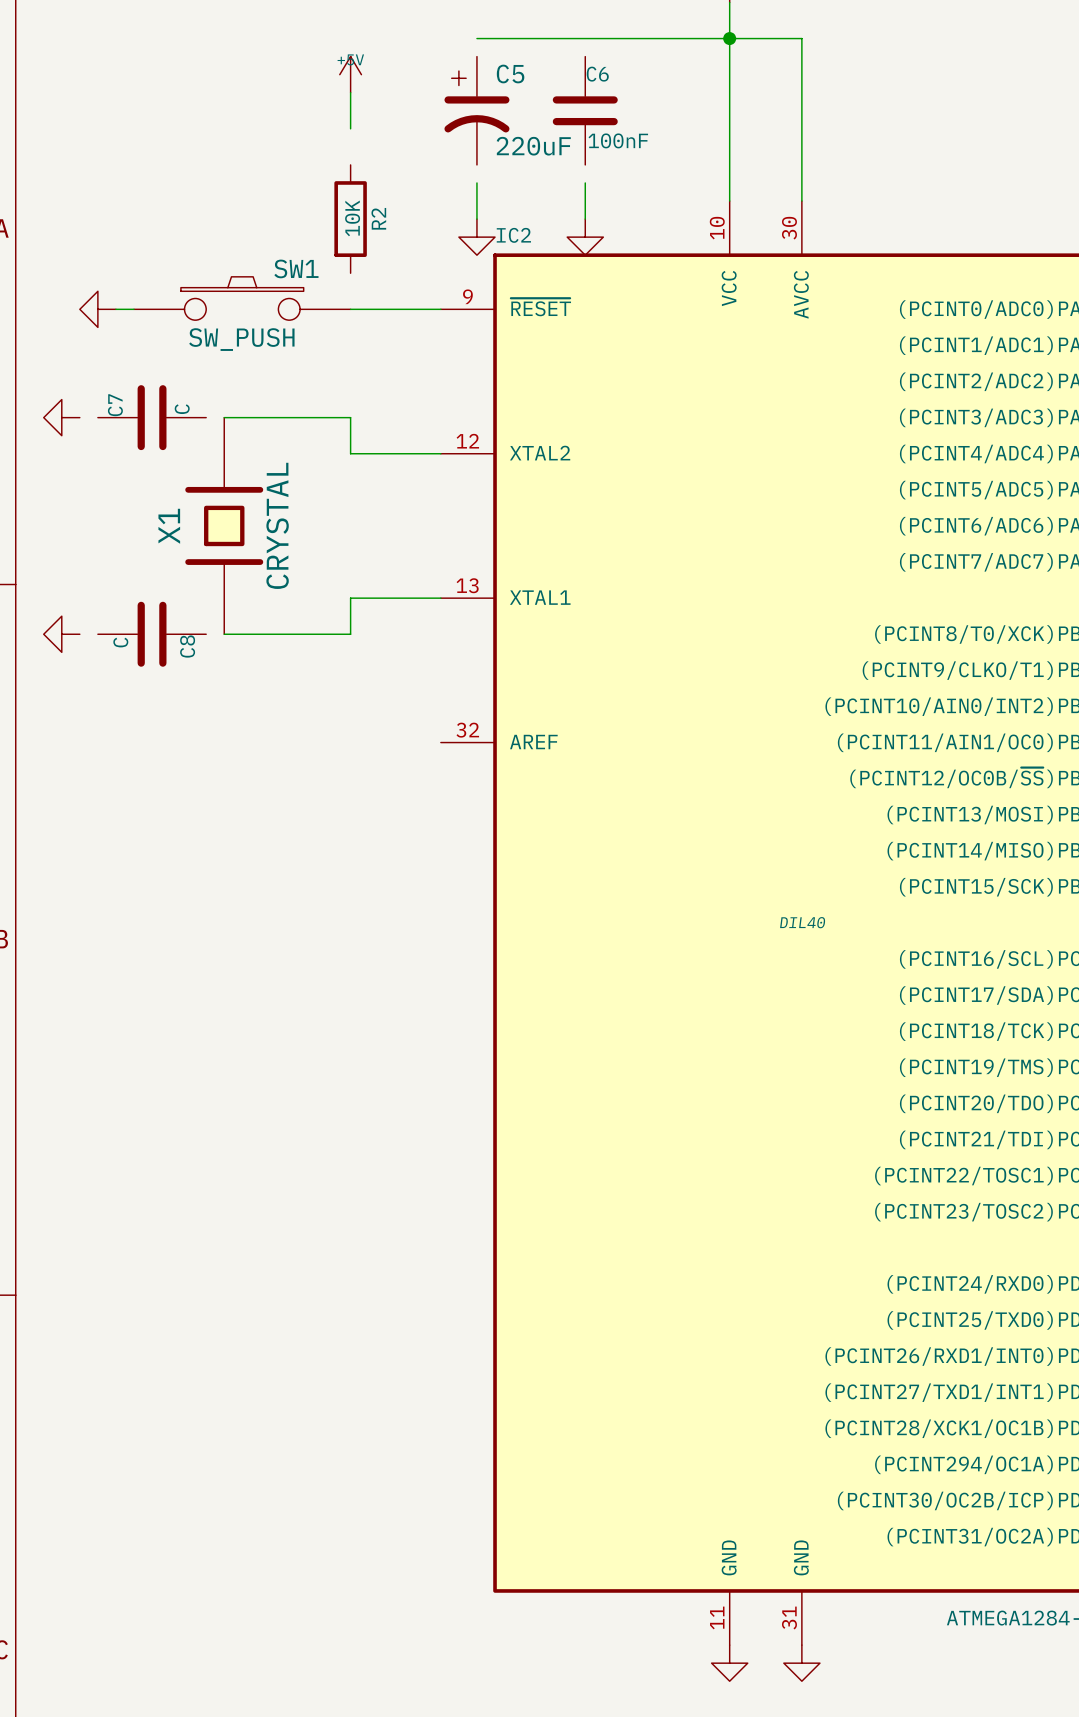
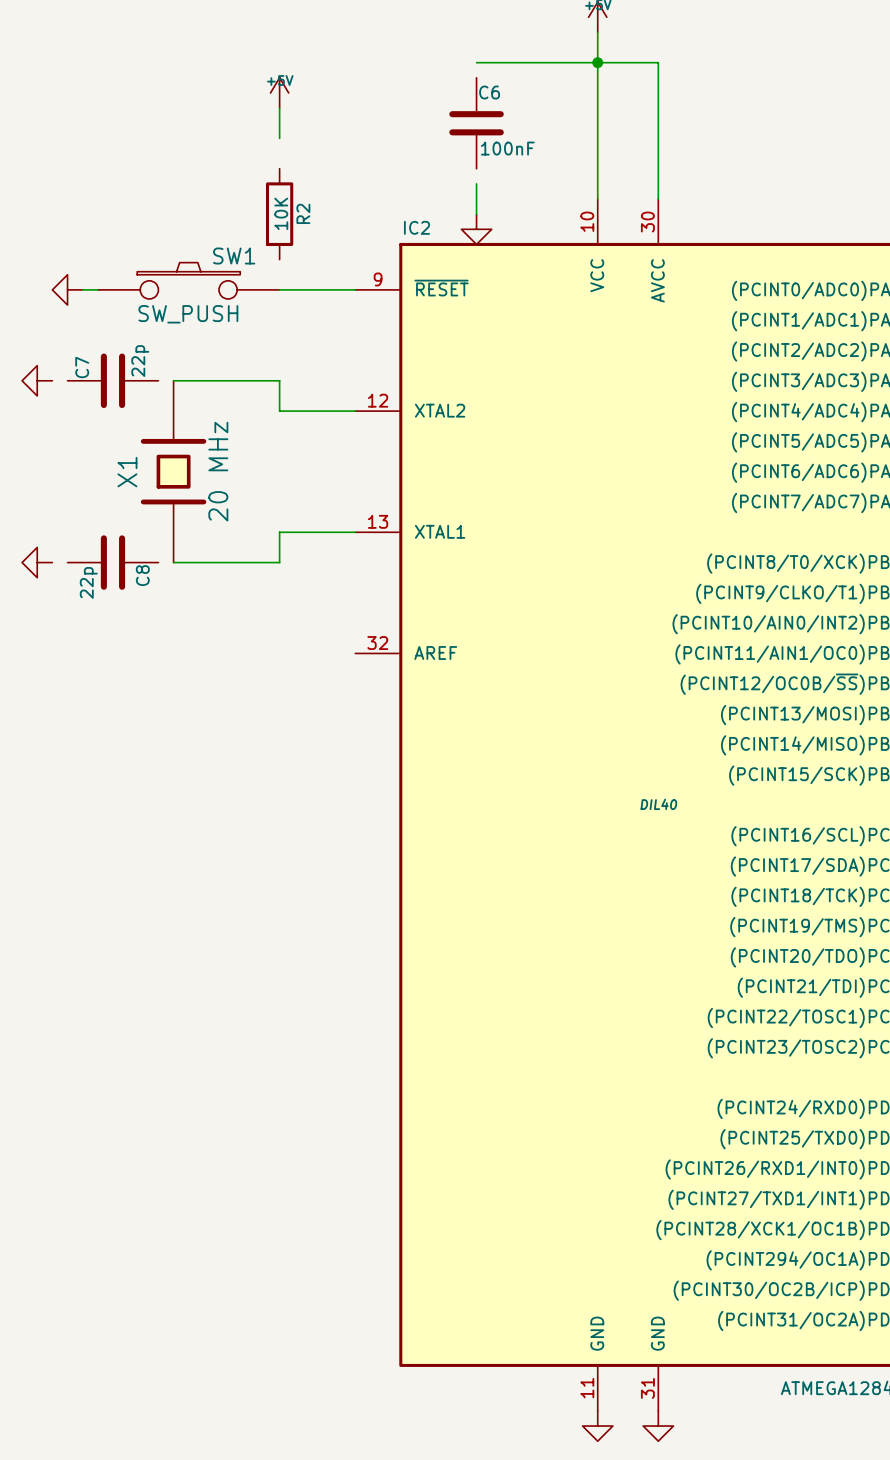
wire: (476, 38) (585, 38) -> none
C5: 220uF (476, 110) -> none
wire: (476, 182) (476, 219) -> none
power symbol: (476, 237) -> none
C7 value: C (182, 409) -> 22p (140, 361)
X1 value: CRYSTAL (277, 525) -> 20 MHz (218, 471)
C8 value: C (120, 642) -> 22p (88, 582)

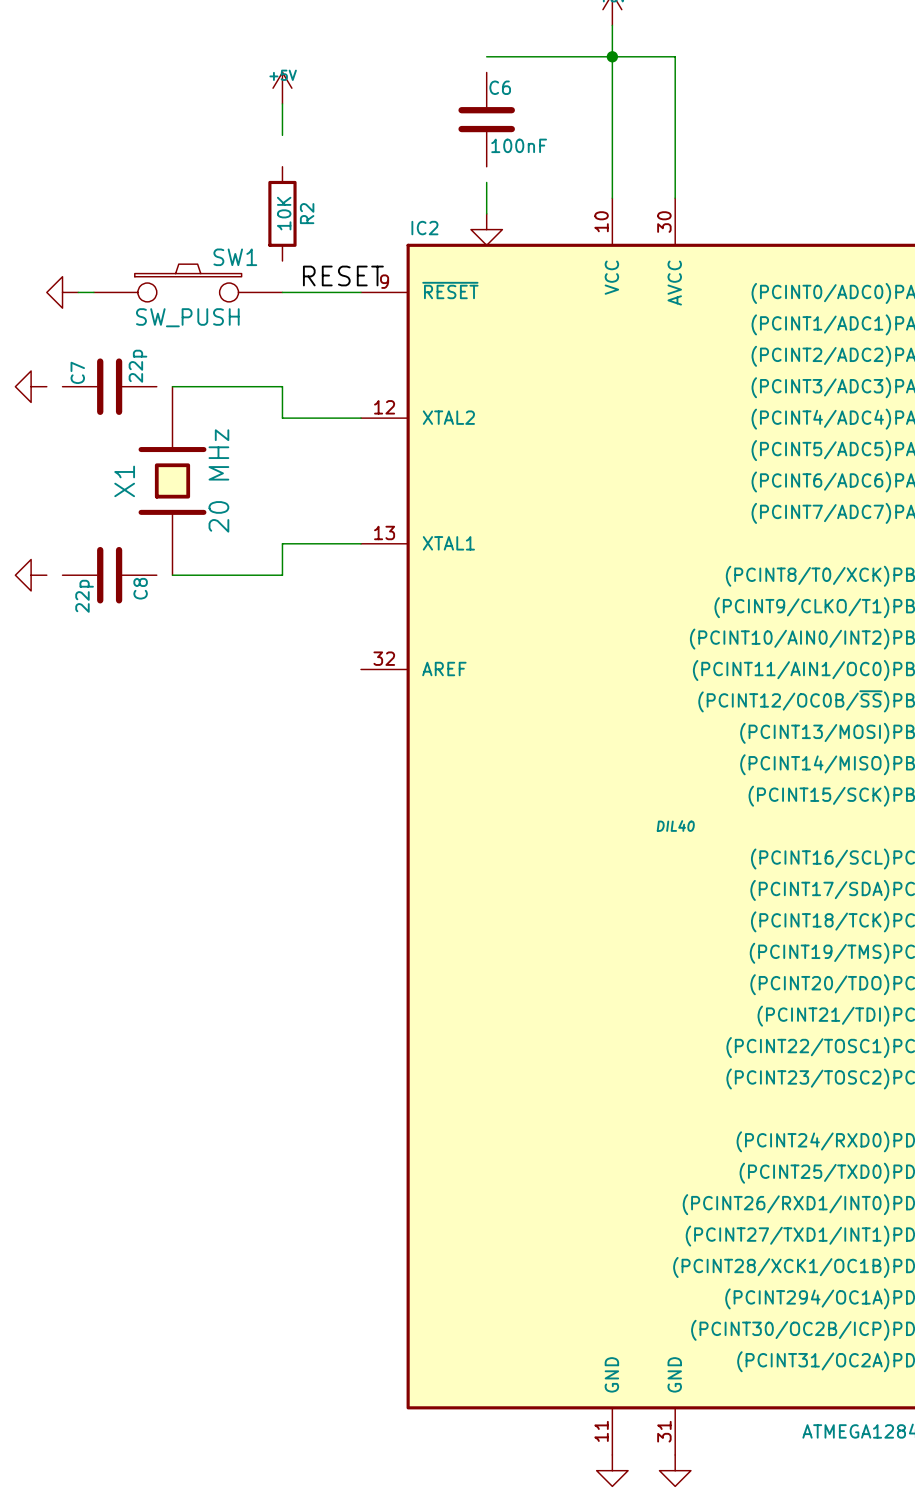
label: none -> RESET (343, 275)

